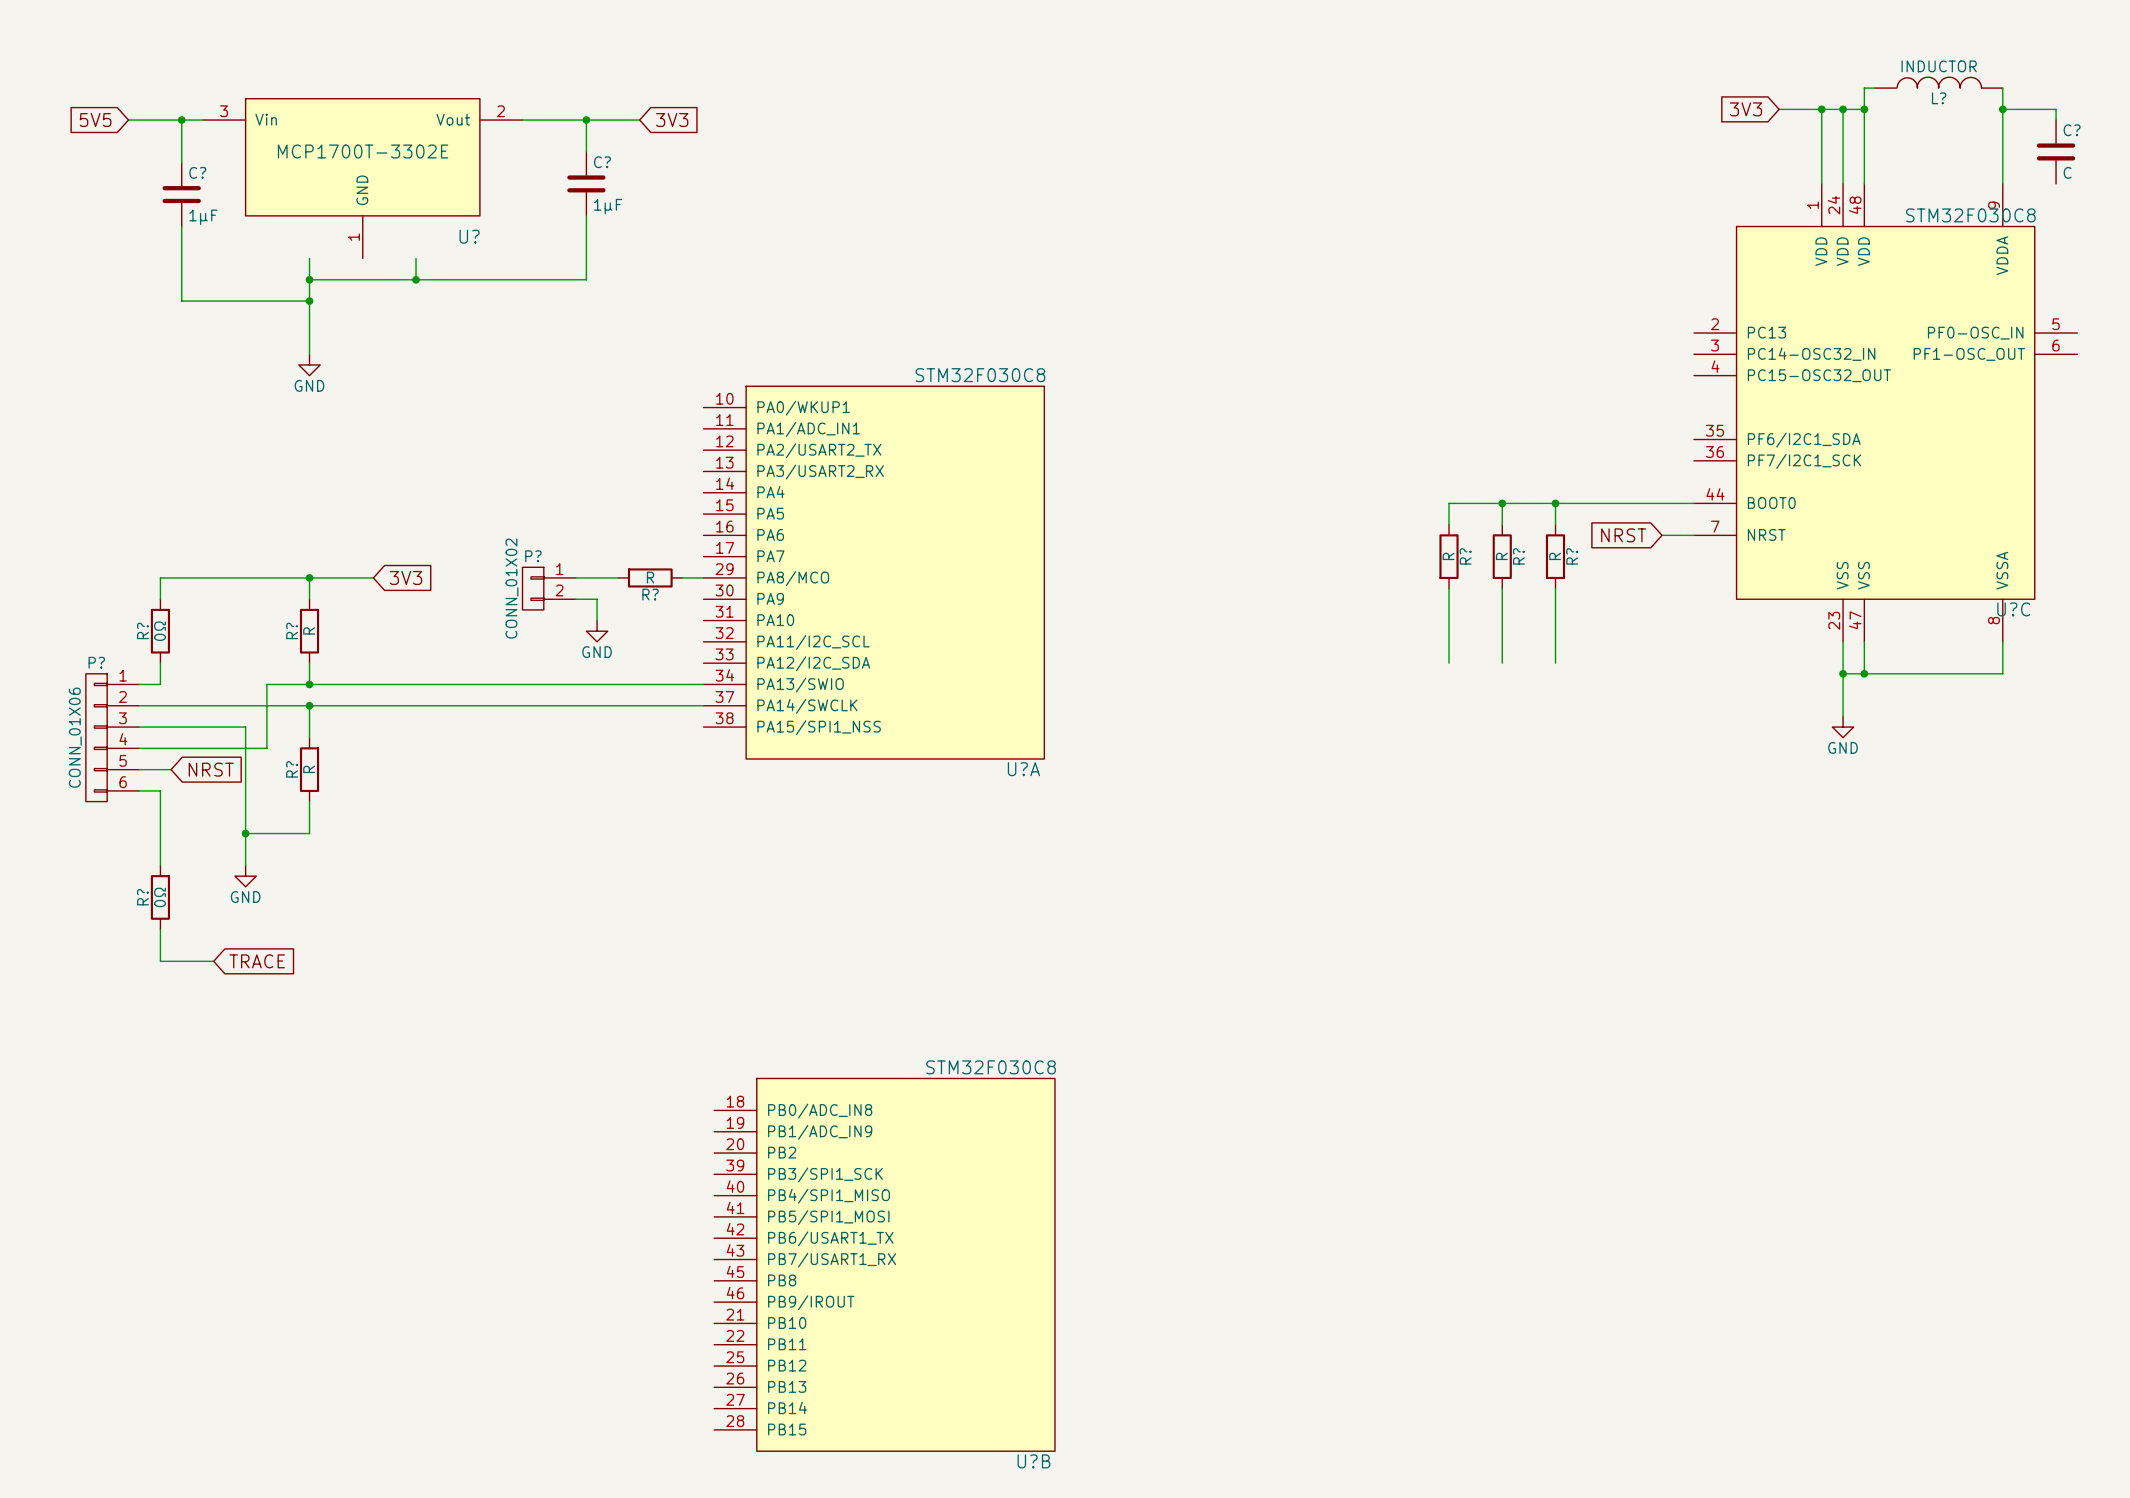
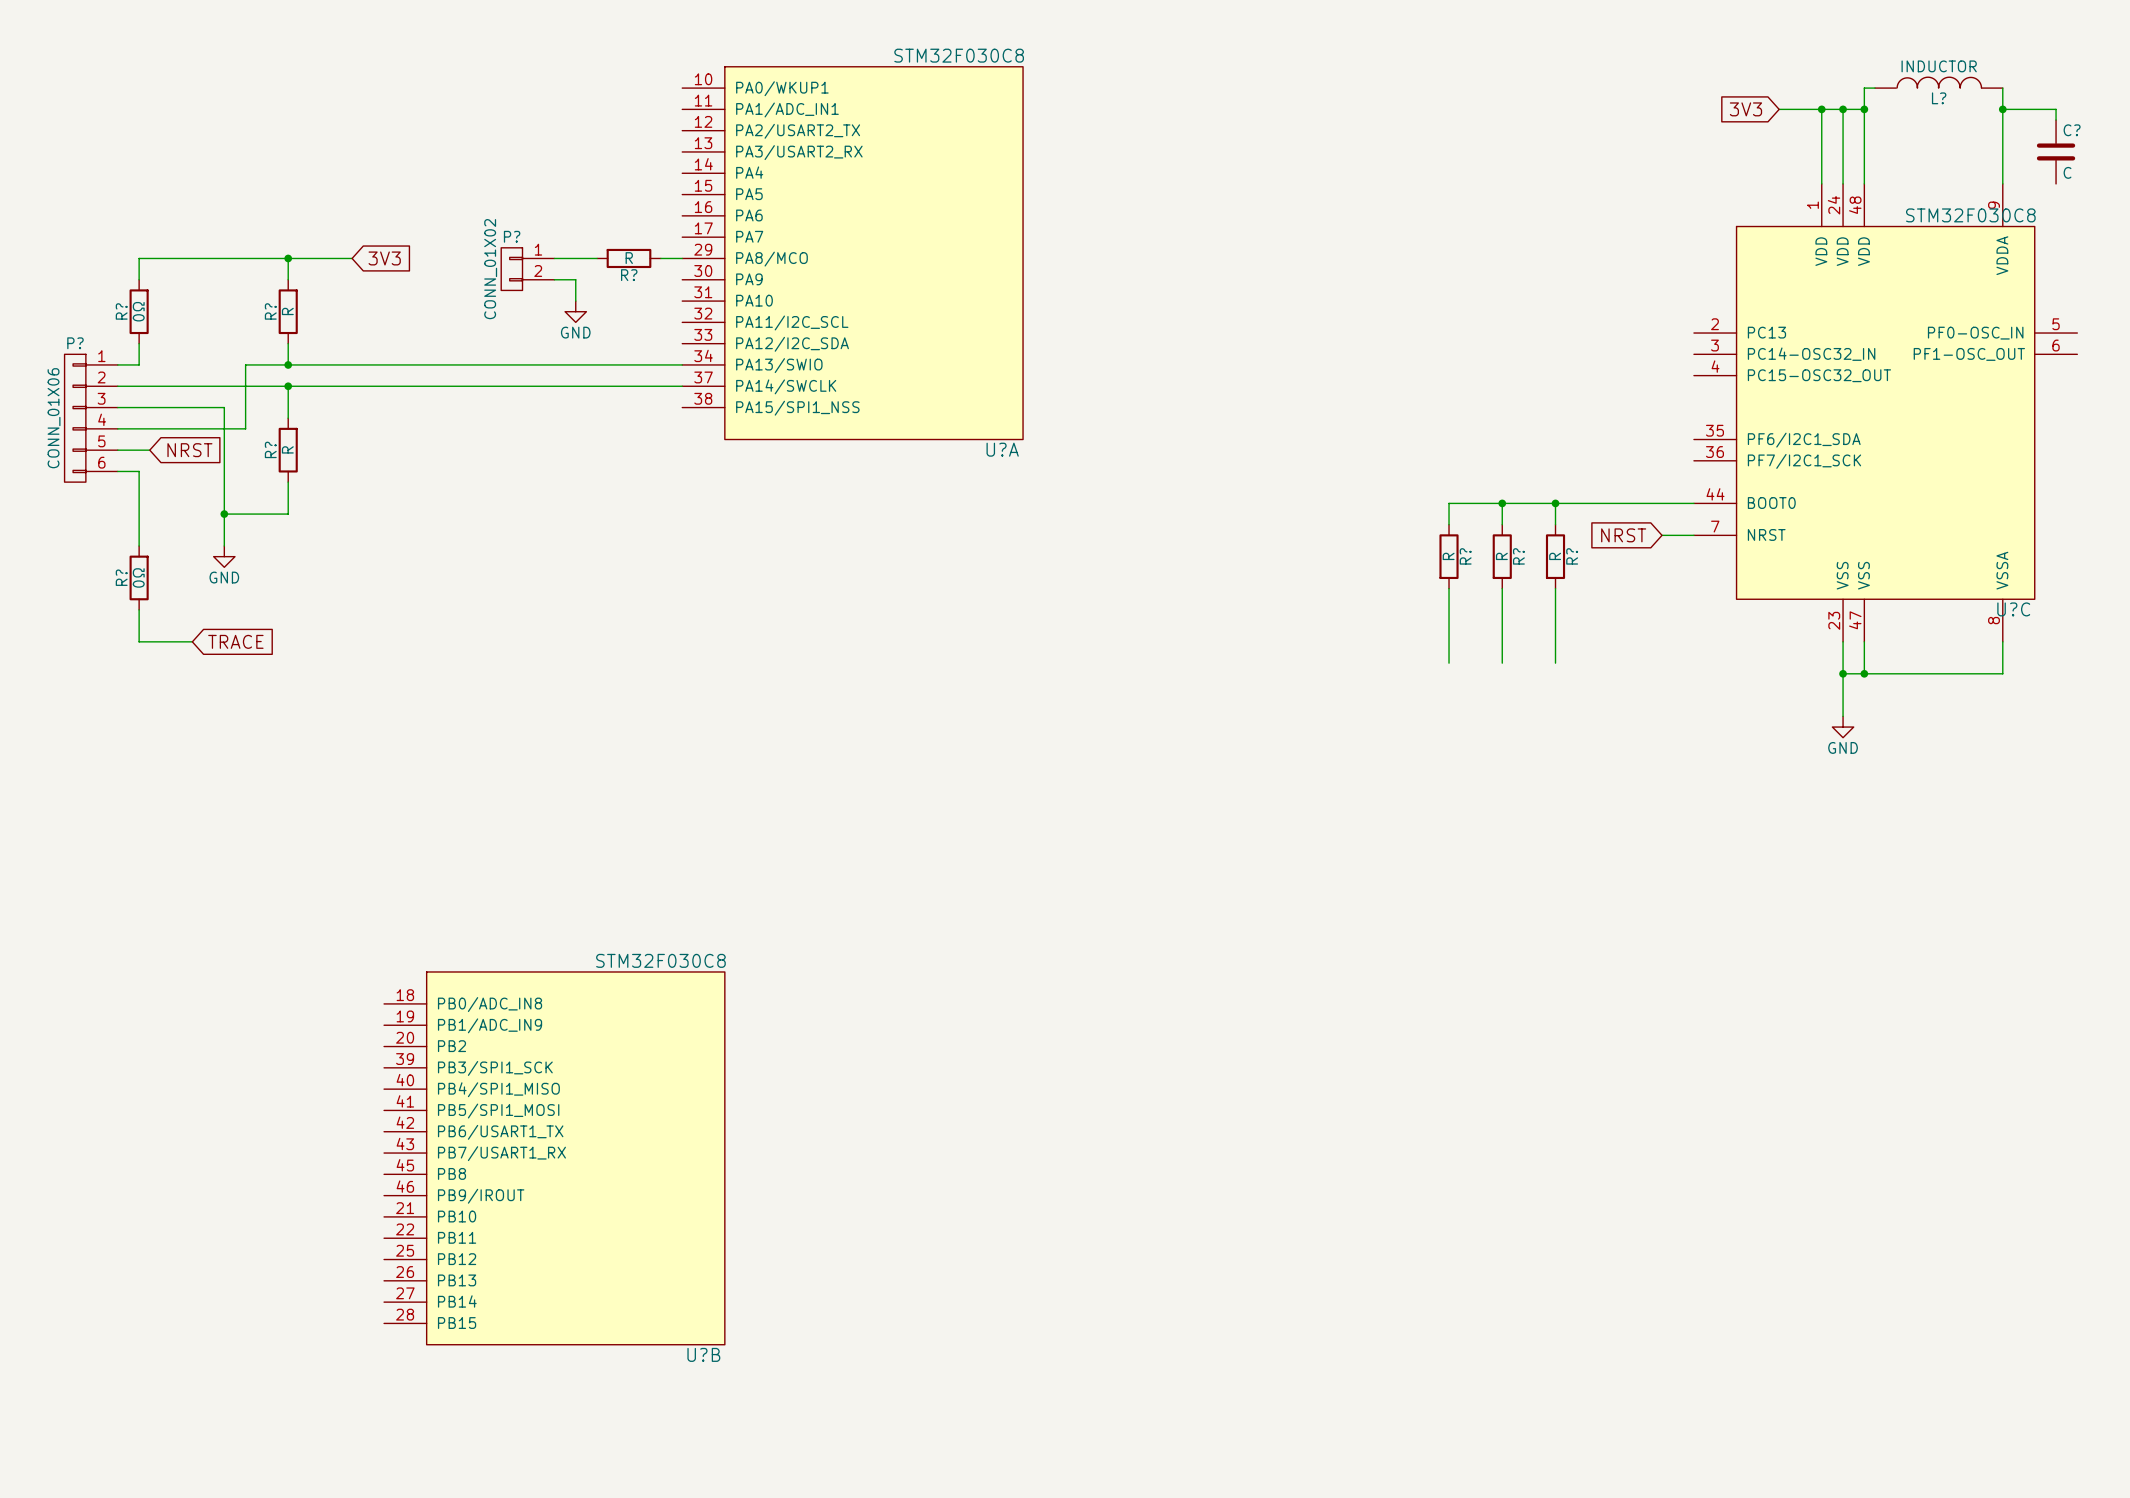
global label: 5V5 (95, 120) -> none
wire: (128, 120) (203, 120) -> none
wire: (181, 120) (181, 162) -> none
junction: (181, 120) -> none
wire: (522, 120) (639, 120) -> none
wire: (586, 120) (586, 151) -> none
junction: (586, 120) -> none
global label: 3V3 (672, 120) -> none
U?: MCP1700T-3302E (362, 178) -> none
C?: 1μF (586, 183) -> none
C?: 1μF (181, 194) -> none
wire: (586, 215) (586, 279) (575, 279) -> (575, 301) (575, 279)
wire: (181, 226) (181, 301) (309, 301) -> none
U?A: none -> STM32F030C8 (852, 253)
junction: none -> (288, 258)
wire: (309, 258) (309, 354) -> none
wire: none -> (352, 258) (139, 258) (139, 279)
global label: none -> 3V3 (384, 258)
wire: (416, 258) (416, 279) -> (288, 258) (288, 279)
wire: none -> (554, 258) (597, 258)
R?: none -> R (629, 258)
wire: none -> (660, 258) (682, 258)
P?: none -> CONN_01X02 (527, 269)
wire: (309, 279) (554, 279) -> none
junction: (309, 279) -> none
junction: (416, 279) -> none
junction: (309, 301) -> none
R?: none -> 0Ω (139, 311)
R?: none -> R (288, 311)
power symbol: none -> GND (575, 311)
wire: none -> (139, 343) (139, 364) (117, 364)
wire: none -> (288, 343) (288, 364)
junction: none -> (288, 364)
power symbol: GND (309, 364) -> none
wire: none -> (682, 364) (245, 364) (245, 428) (117, 428)
wire: none -> (117, 386) (682, 386)
wire: none -> (288, 386) (288, 418)
junction: none -> (288, 386)
wire: none -> (117, 407) (224, 407) (224, 546)
P?: none -> CONN_01X06 (91, 418)
wire: none -> (117, 450) (149, 450)
global label: none -> NRST (189, 450)
R?: none -> R (288, 450)
wire: none -> (117, 471) (139, 471) (139, 546)
wire: none -> (288, 482) (288, 514) (224, 514)
junction: none -> (224, 514)
power symbol: none -> GND (224, 556)
U?A: STM32F030C8 (873, 572) -> none
wire: (309, 577) (309, 599) -> none
junction: (309, 577) -> none
wire: (373, 577) (160, 577) (160, 599) -> none
global label: 3V3 (405, 577) -> none
wire: (575, 577) (618, 577) -> none
R?: R (650, 577) -> none
wire: (682, 577) (703, 577) -> none
P?: CONN_01X02 (549, 588) -> none
wire: (575, 599) (597, 599) (597, 620) -> none
wire: none -> (139, 609) (139, 641) (192, 641)
R? position: (160, 631) -> (139, 577)
R?: R (309, 631) -> none
power symbol: GND (597, 631) -> none
global label: none -> TRACE (235, 641)
wire: (160, 663) (160, 684) (139, 684) -> none
wire: (309, 663) (309, 684) -> none
junction: (309, 684) -> none
wire: (703, 684) (266, 684) (266, 748) (139, 748) -> none
wire: (139, 705) (703, 705) -> none
wire: (309, 705) (309, 737) -> none
junction: (309, 705) -> none
wire: (139, 727) (245, 727) (245, 865) -> none
P?: CONN_01X06 (112, 737) -> none
wire: (139, 769) (171, 769) -> none
global label: NRST (211, 769) -> none
R?: R (309, 769) -> none
wire: (139, 790) (160, 790) (160, 865) -> none
wire: (309, 801) (309, 833) (245, 833) -> none
junction: (245, 833) -> none
power symbol: GND (245, 876) -> none
R?: 0Ω (160, 897) -> none
wire: (160, 929) (160, 961) (213, 961) -> none
global label: TRACE (257, 961) -> none
U?B: none -> STM32F030C8 (554, 1158)
U?B: STM32F030C8 (884, 1264) -> none

